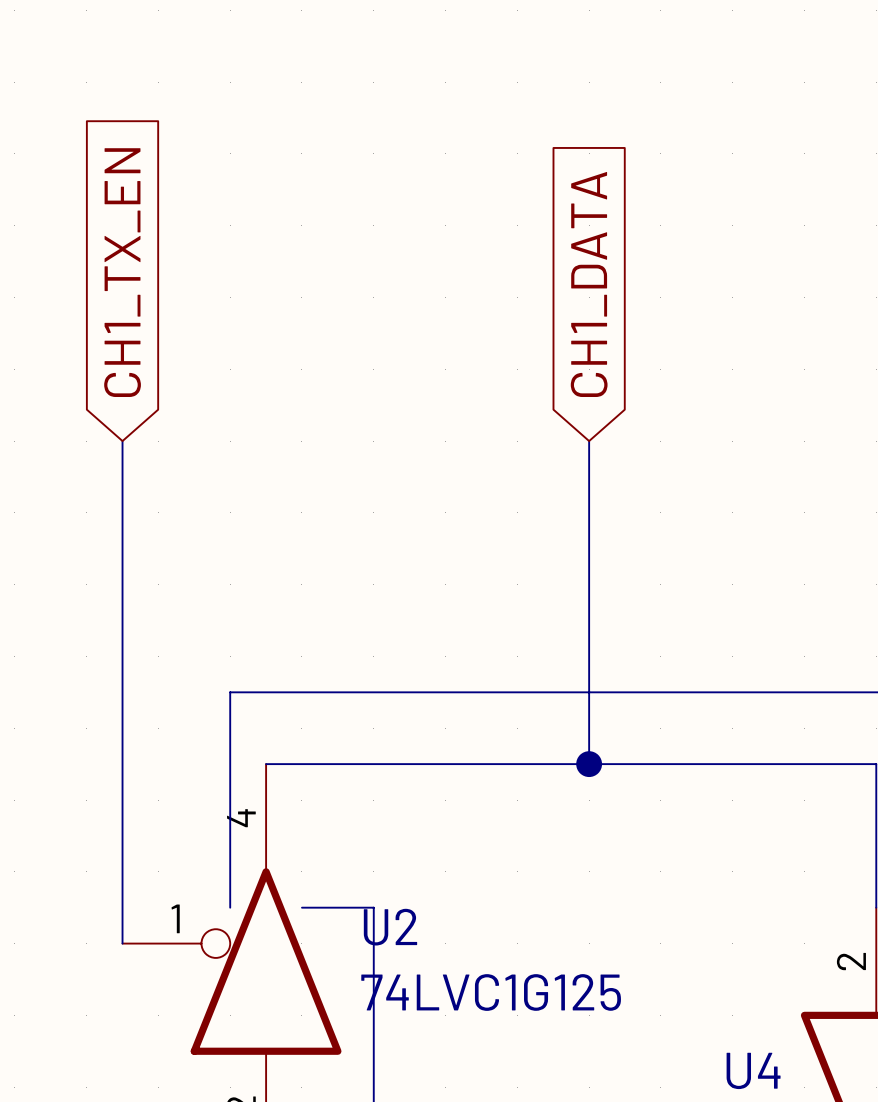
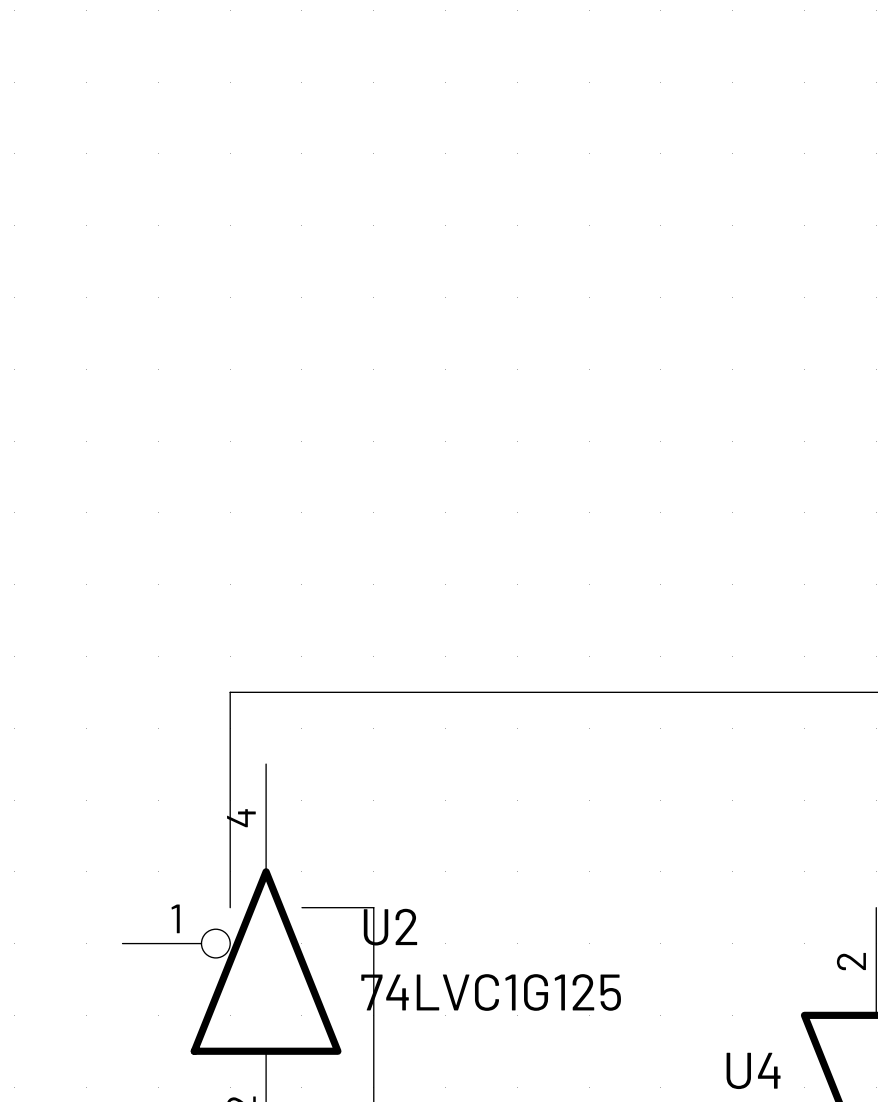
global label: CH1_TX_EN (122, 272) -> none
global label: CH1_DATA (589, 284) -> none
wire: (122, 441) (122, 943) -> none
wire: (589, 441) (589, 764) -> none
wire: (266, 764) (876, 764) (876, 907) -> none
junction: (589, 764) -> none

